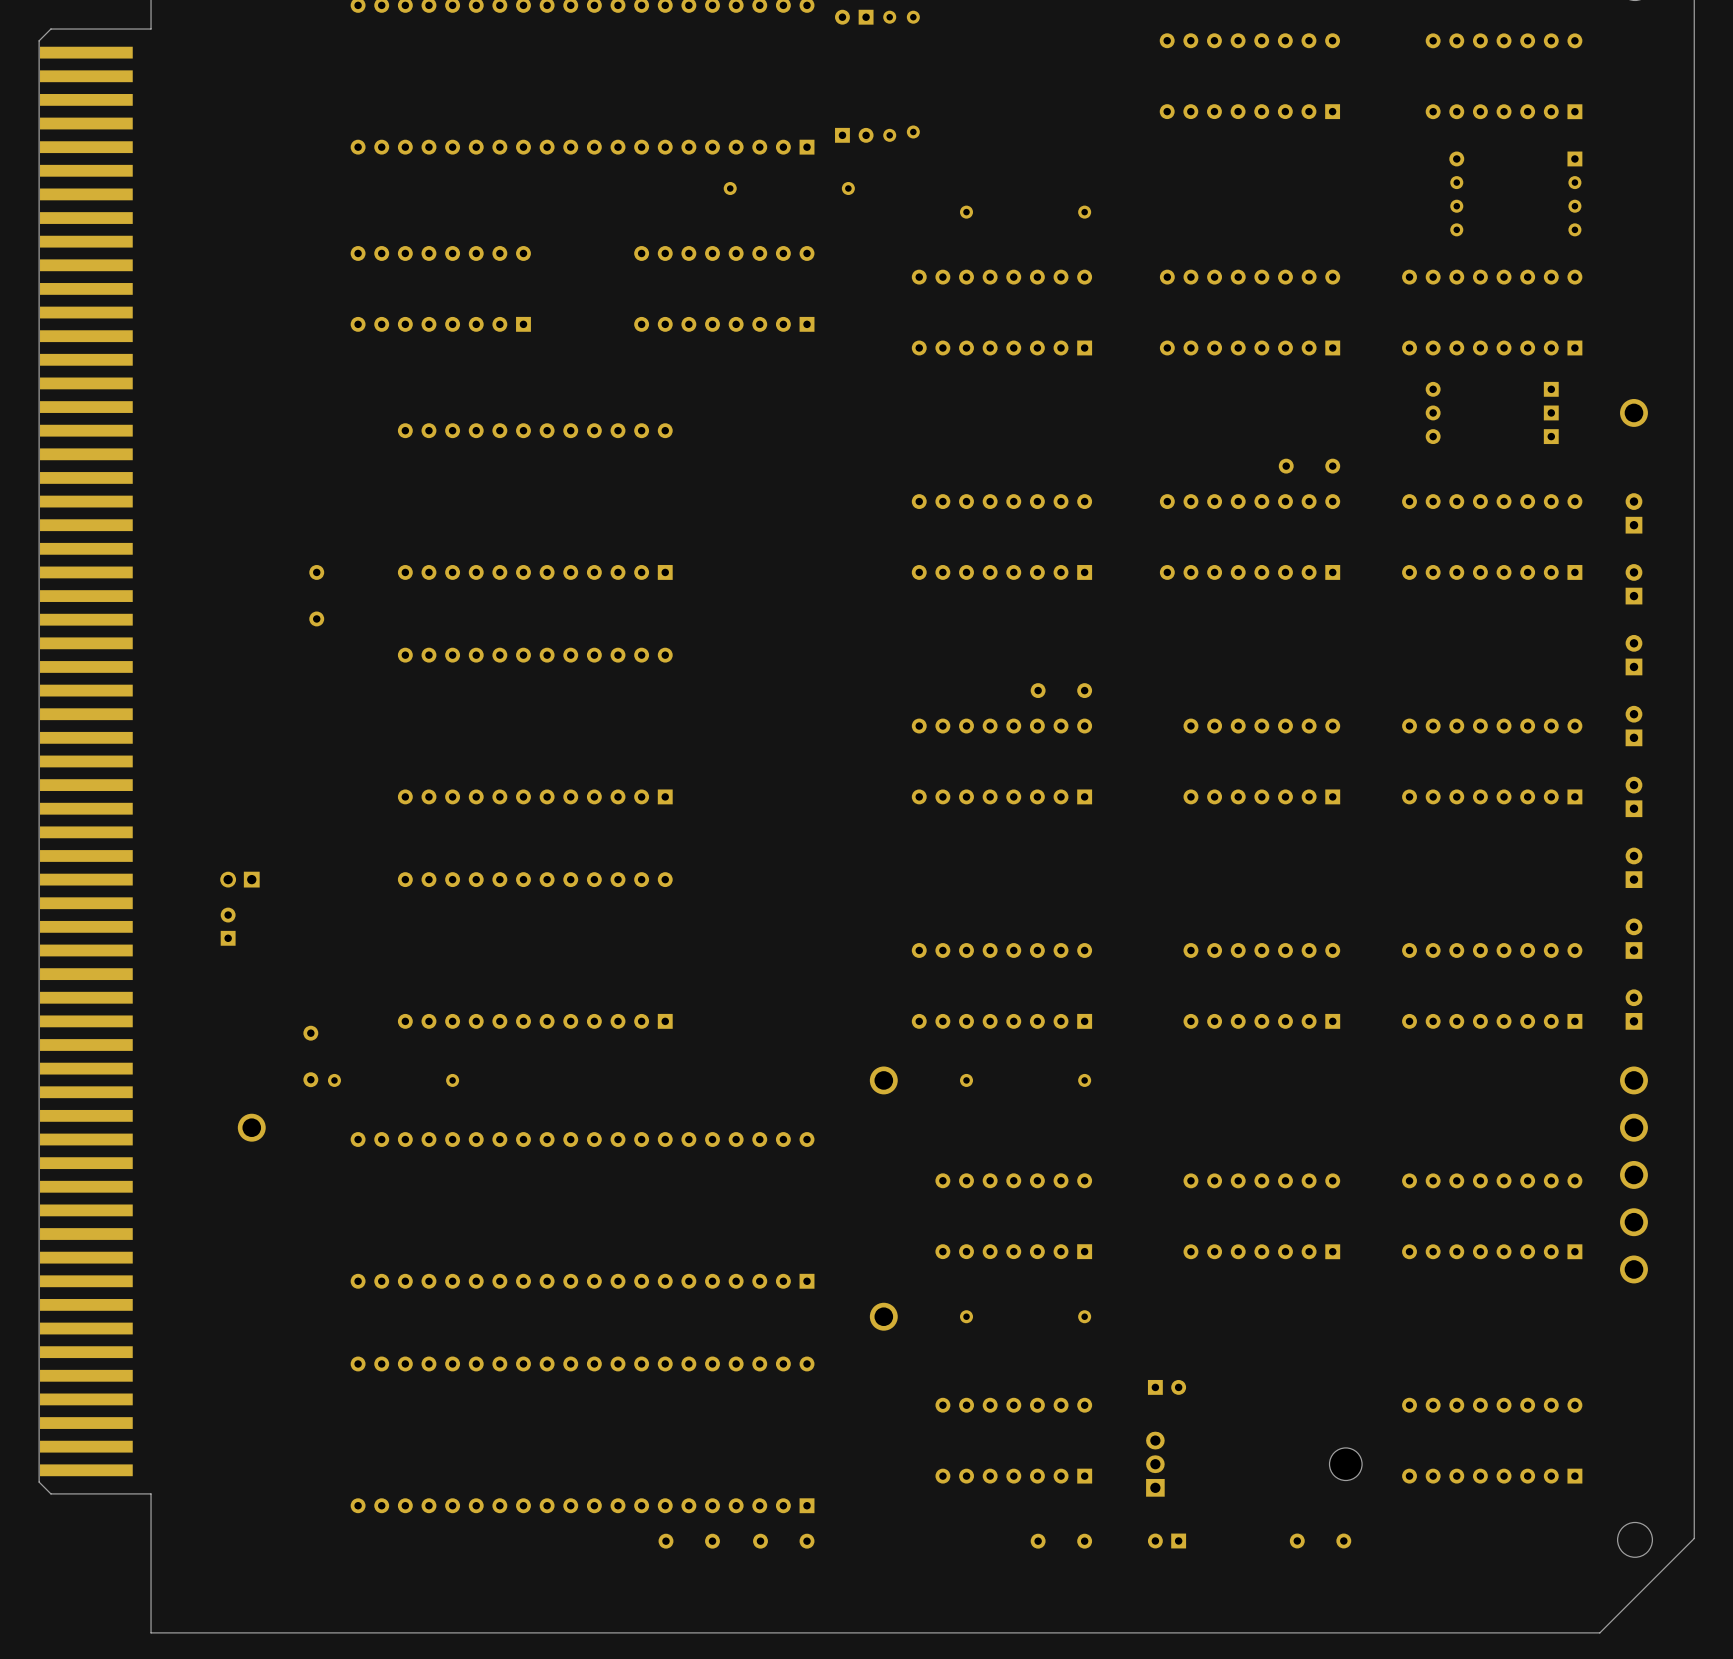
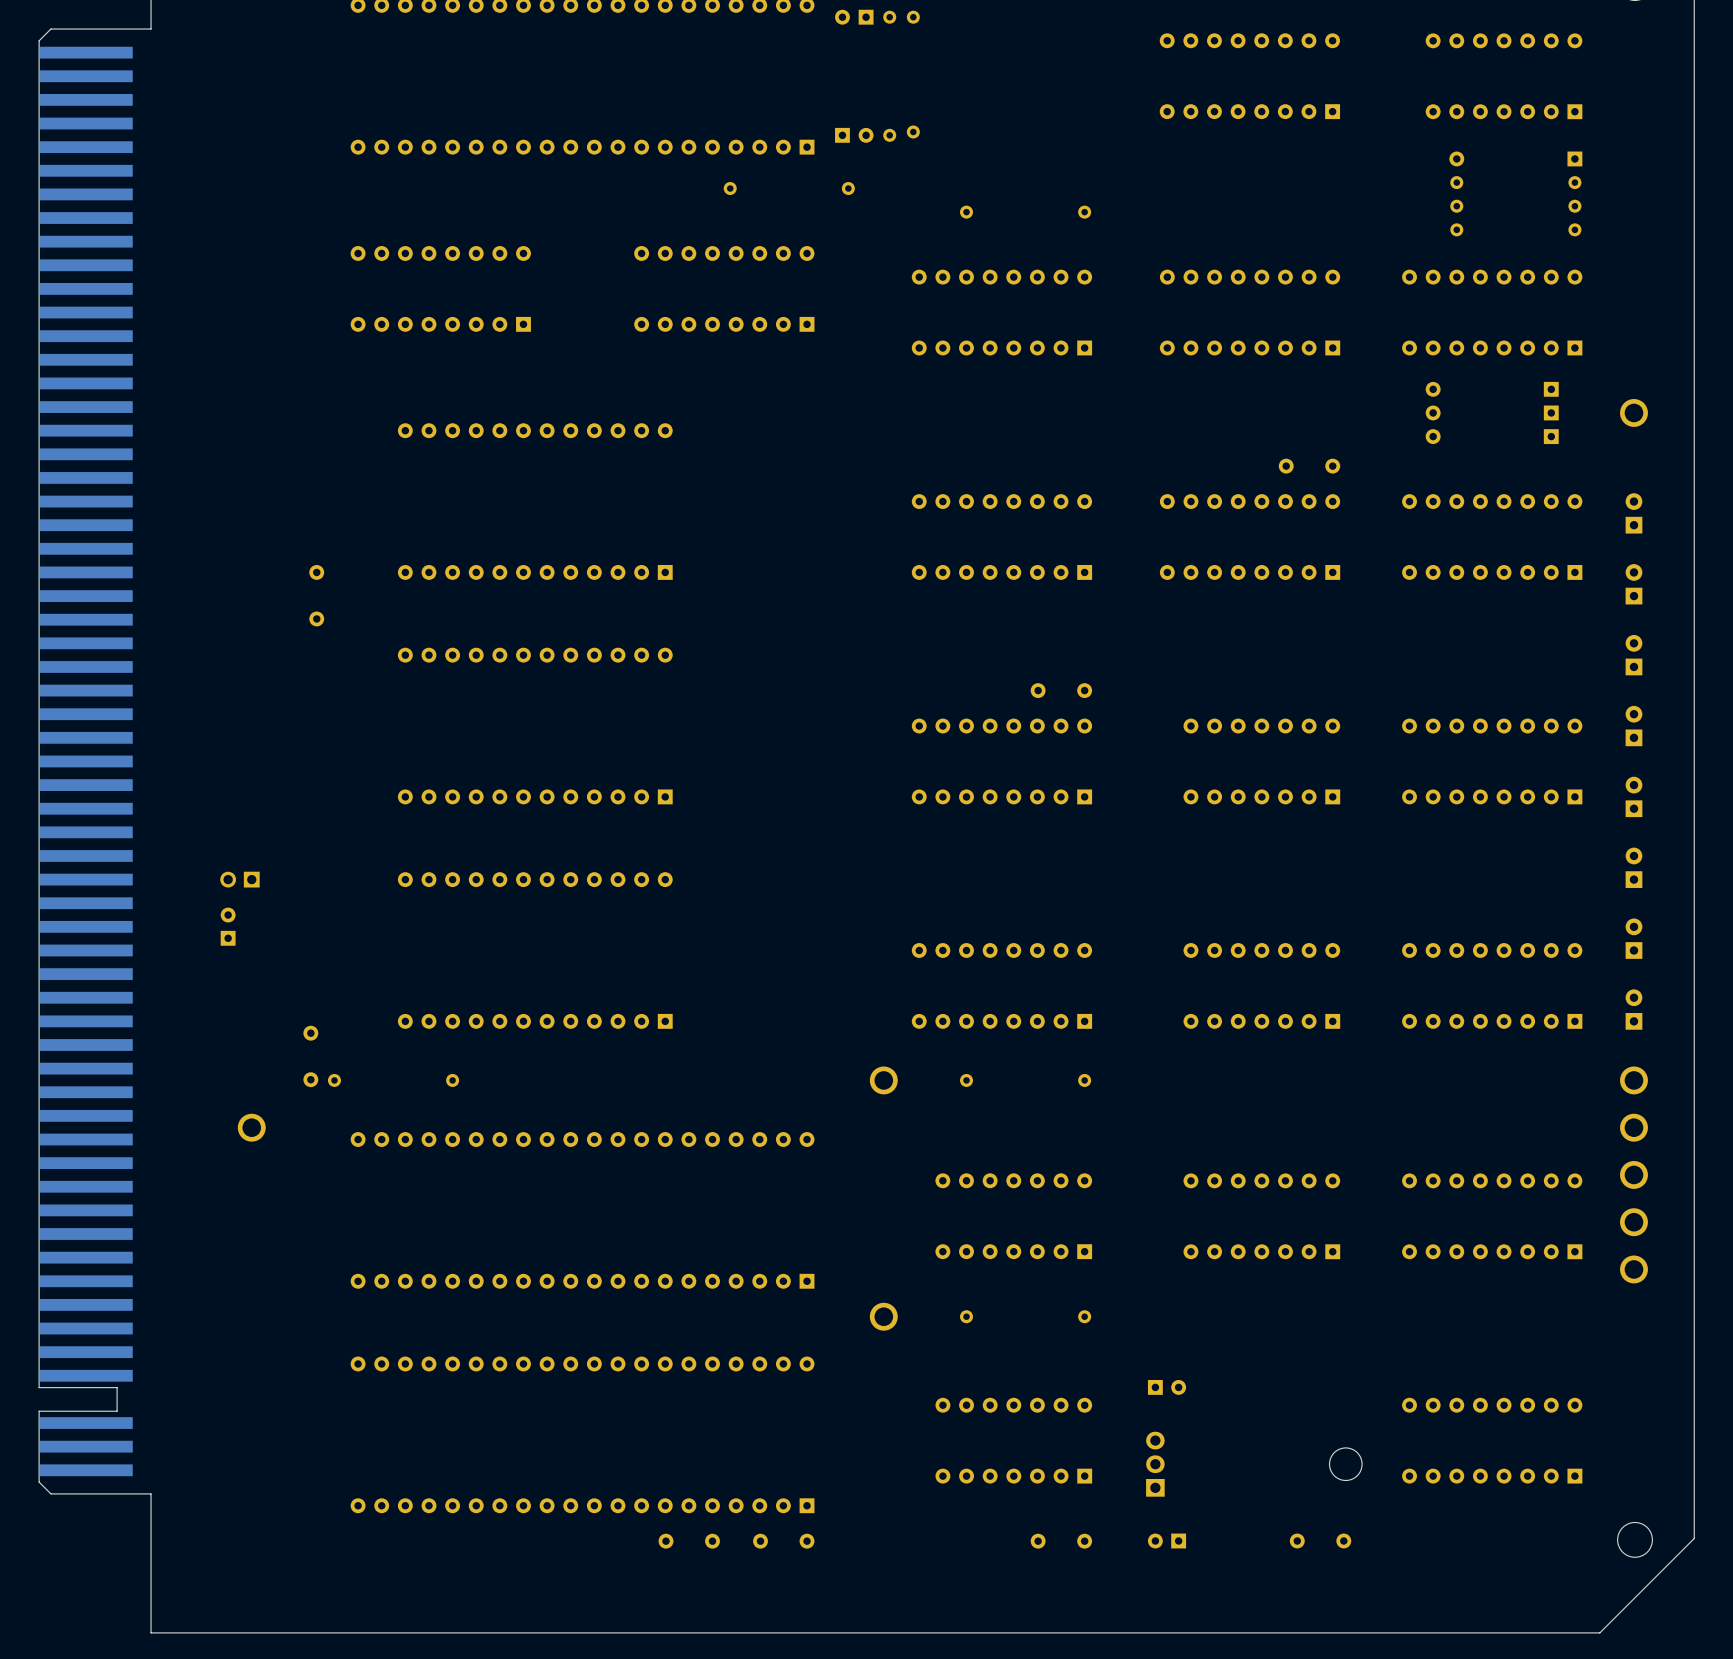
part footprint: [38, 28, 152, 1495] -> [38, 28, 152, 1495]

